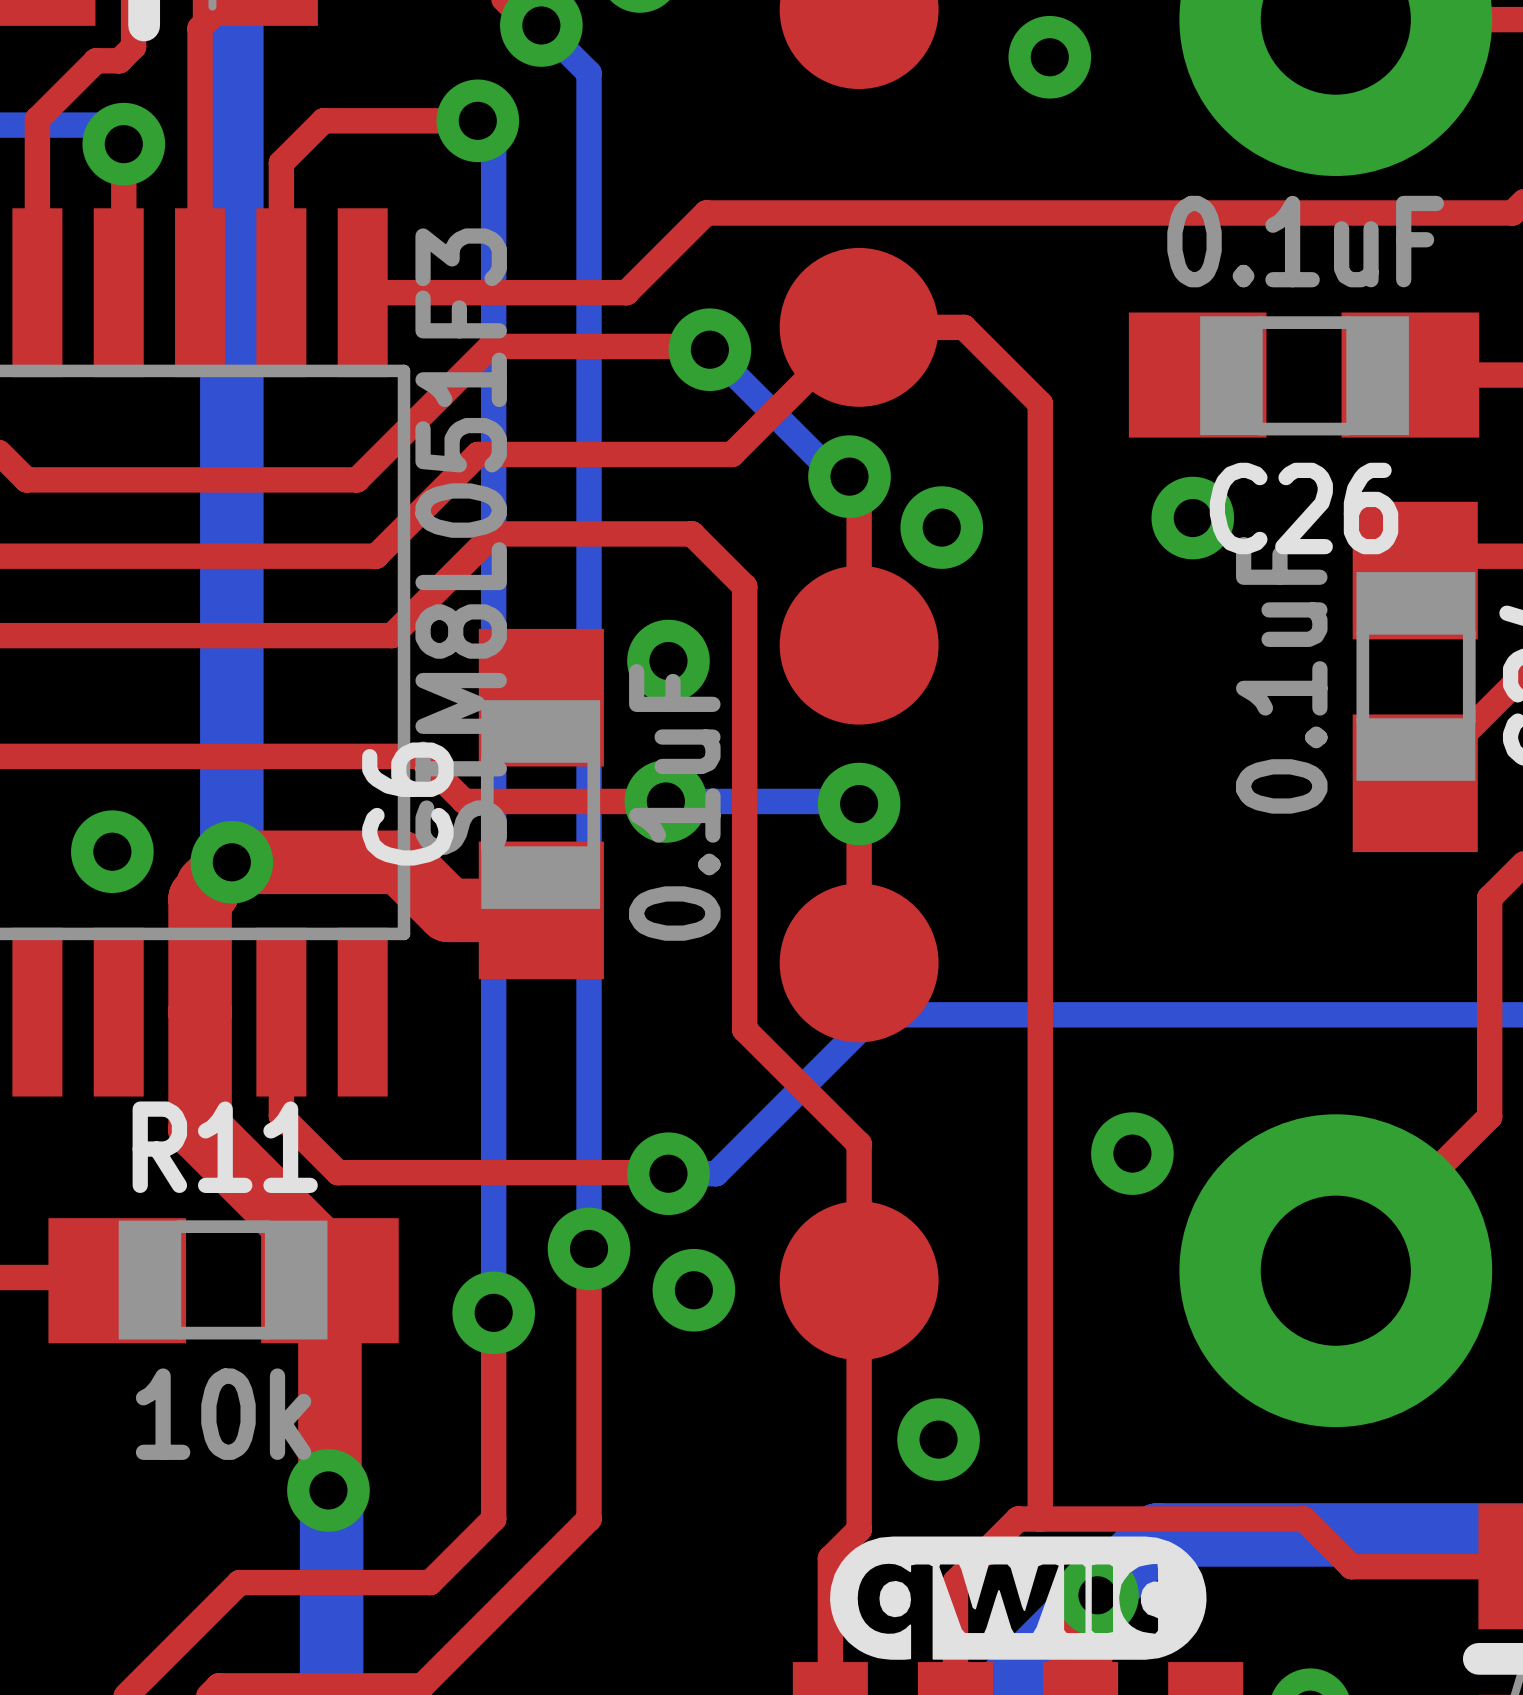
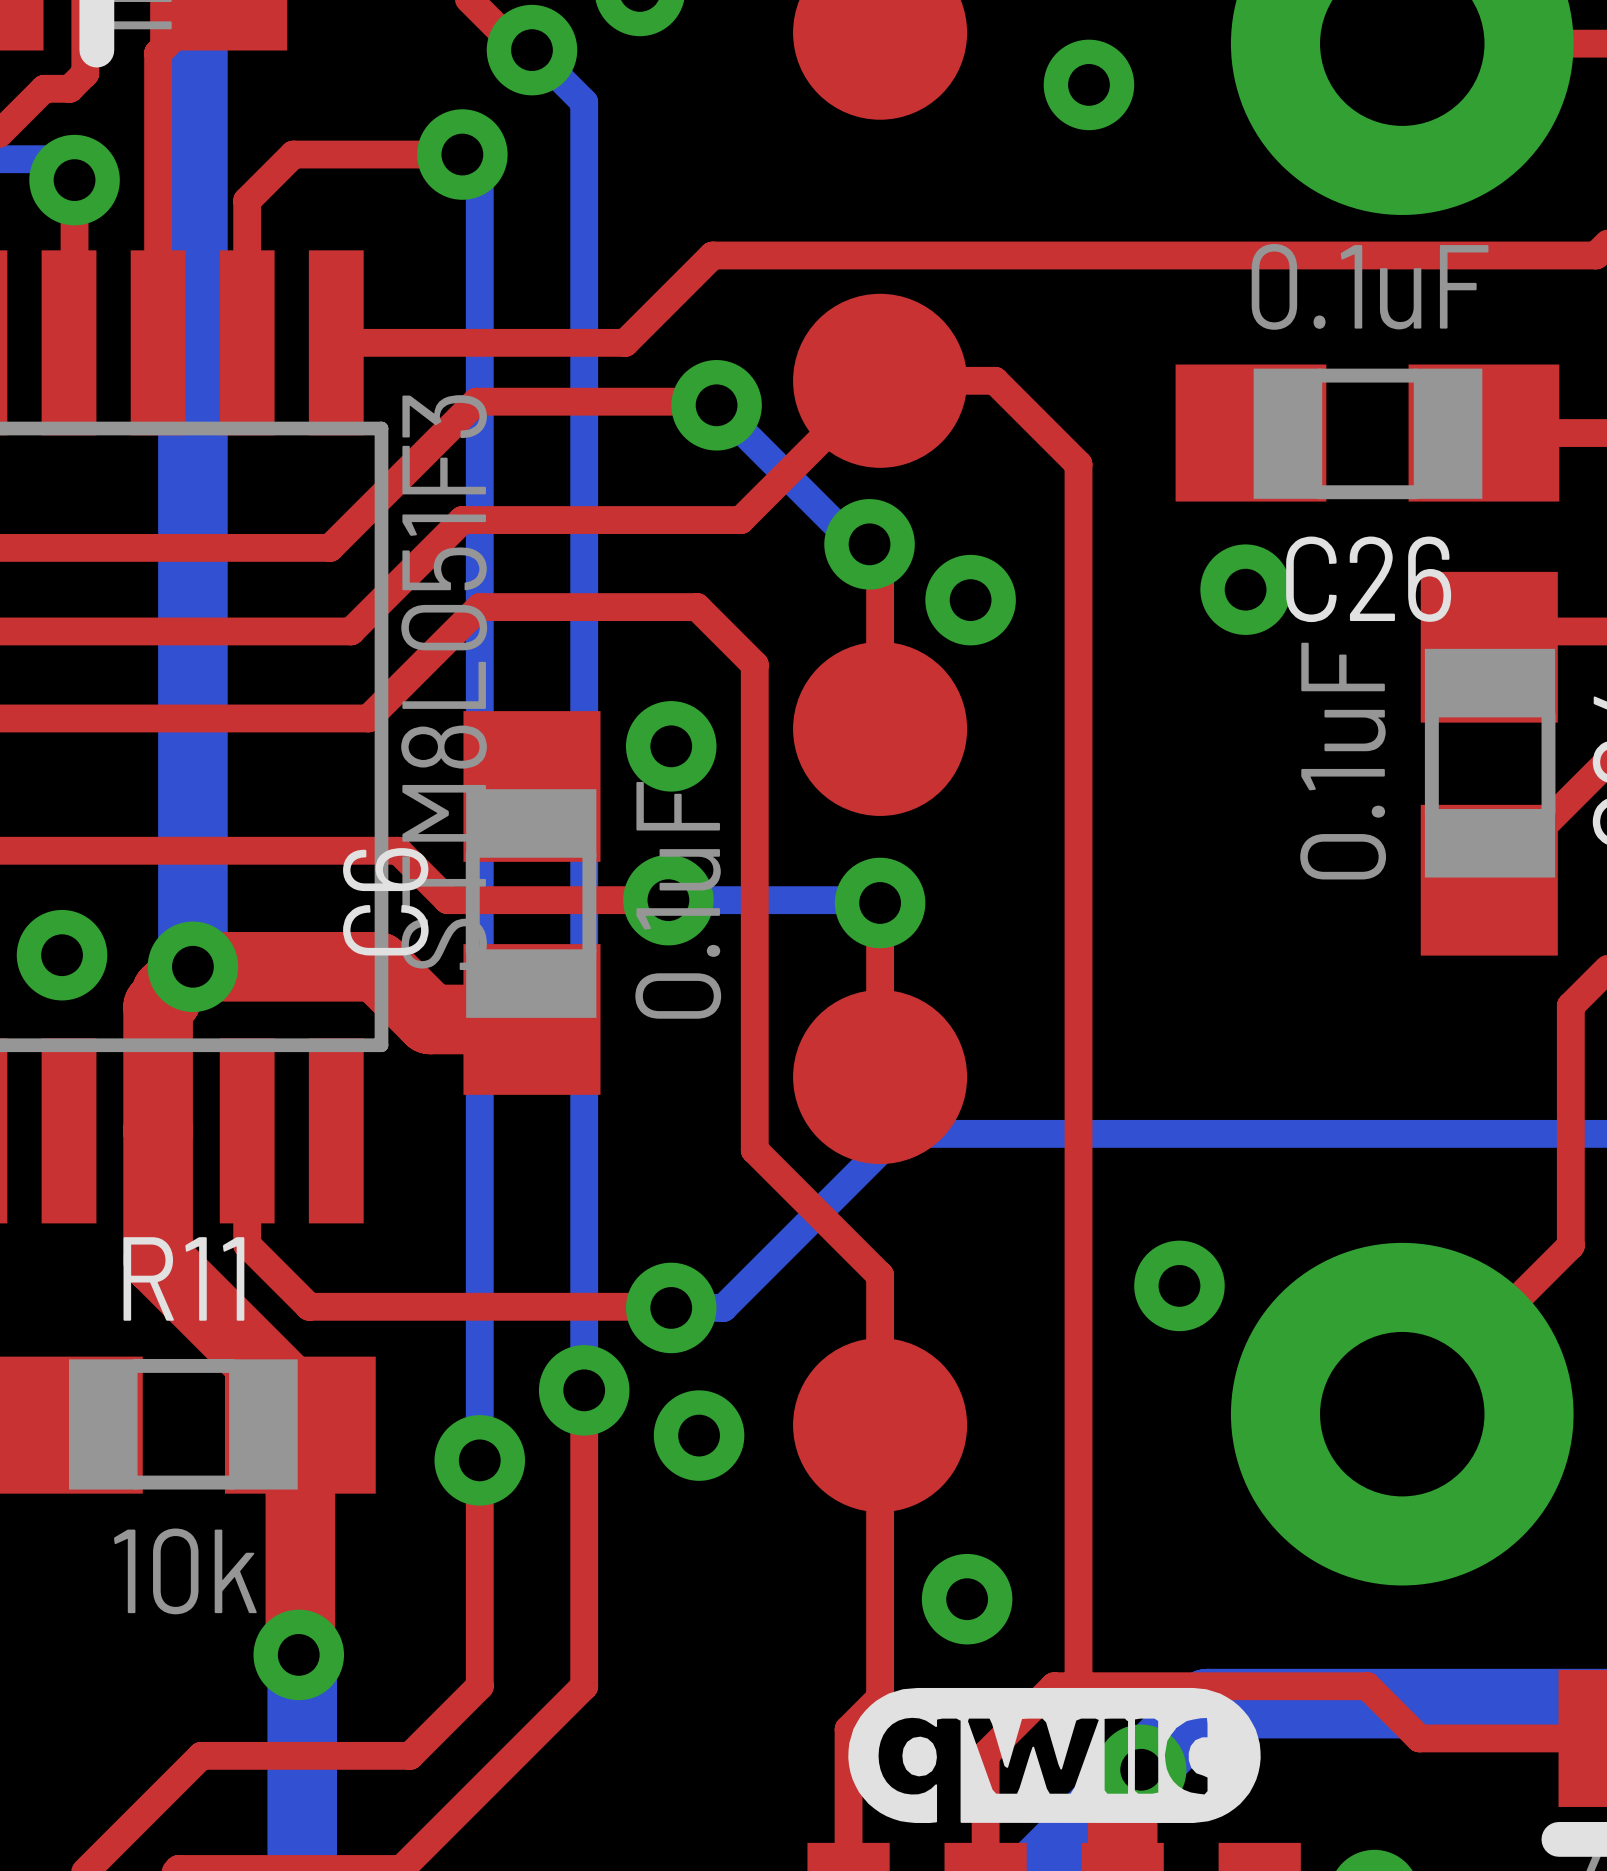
drawing position: (1018, 1598) -> (1054, 1755)

